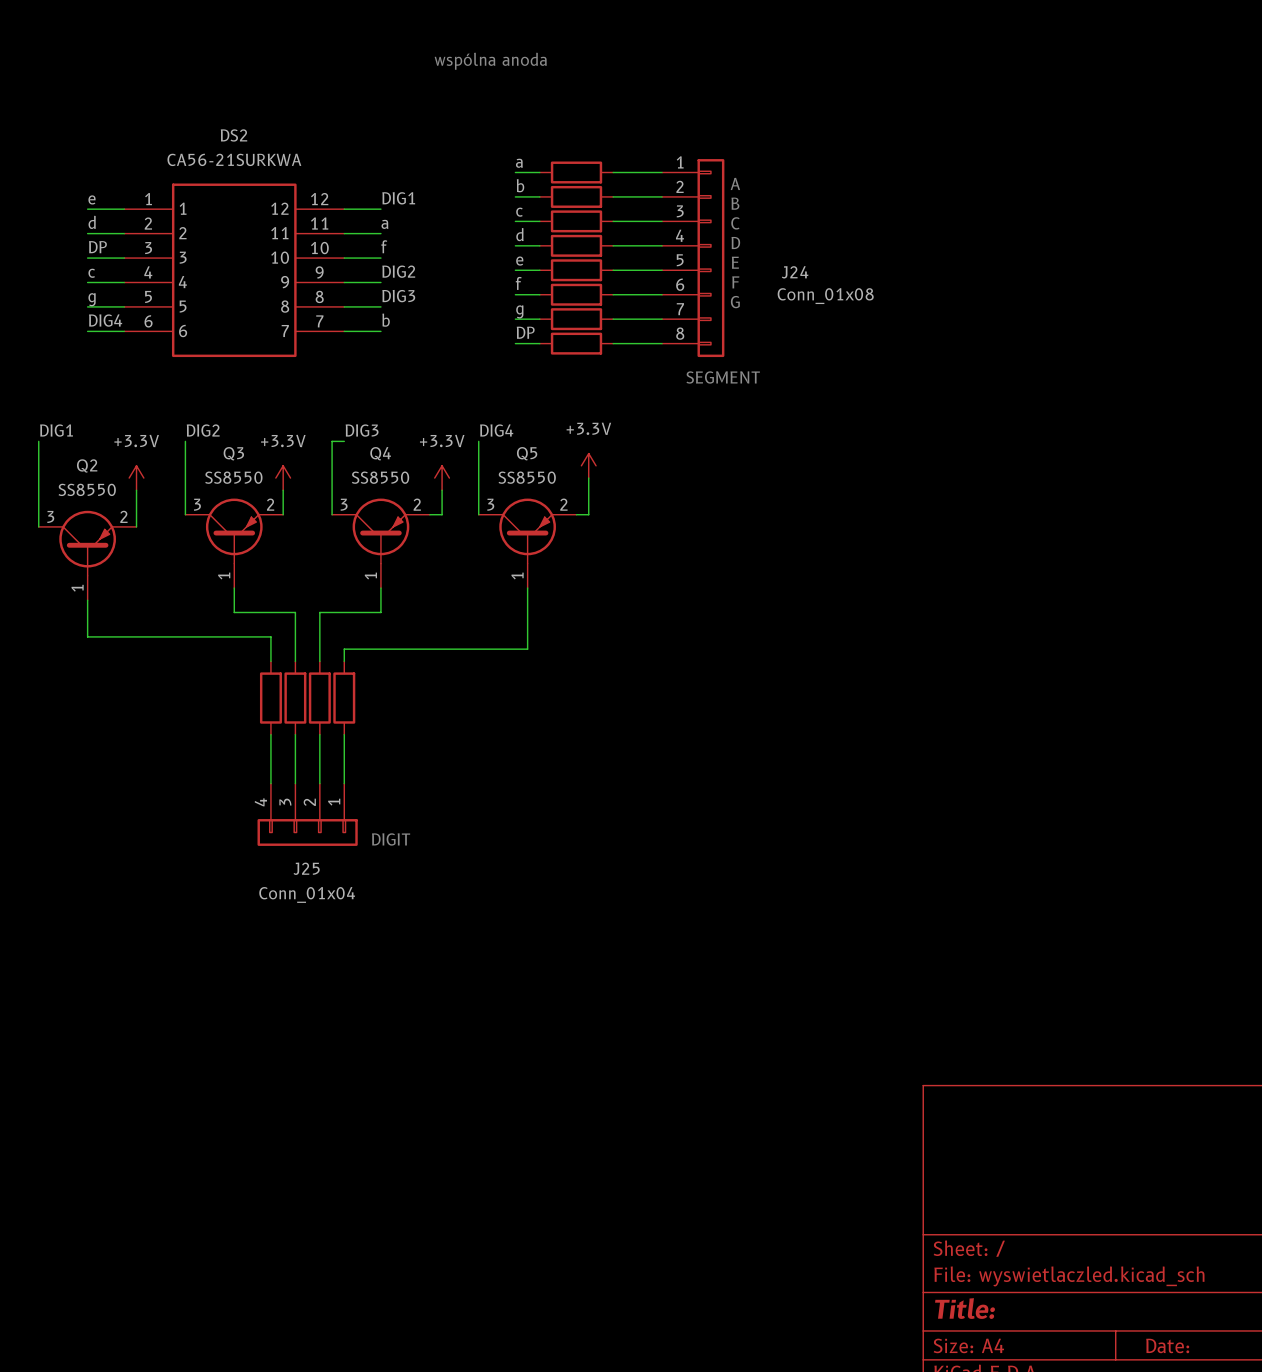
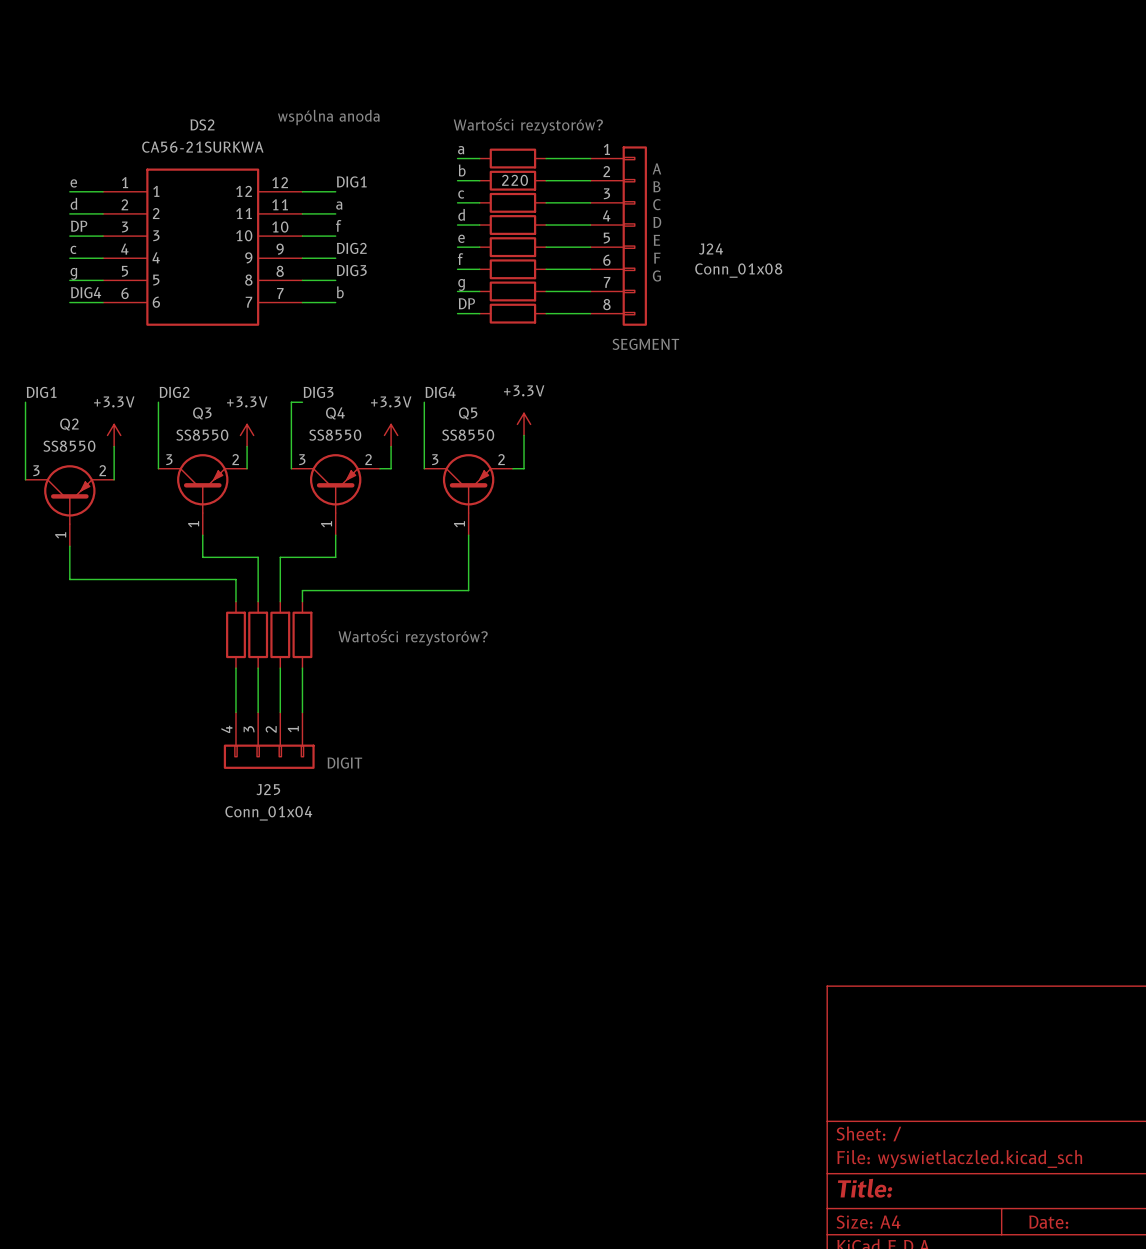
text position: wspólna anoda (490, 61) -> wspólna anoda (328, 117)
text: none -> Wartości rezystorów? (528, 126)
part value: none -> 220 (515, 180)
text: none -> Wartości rezystorów? (413, 637)

